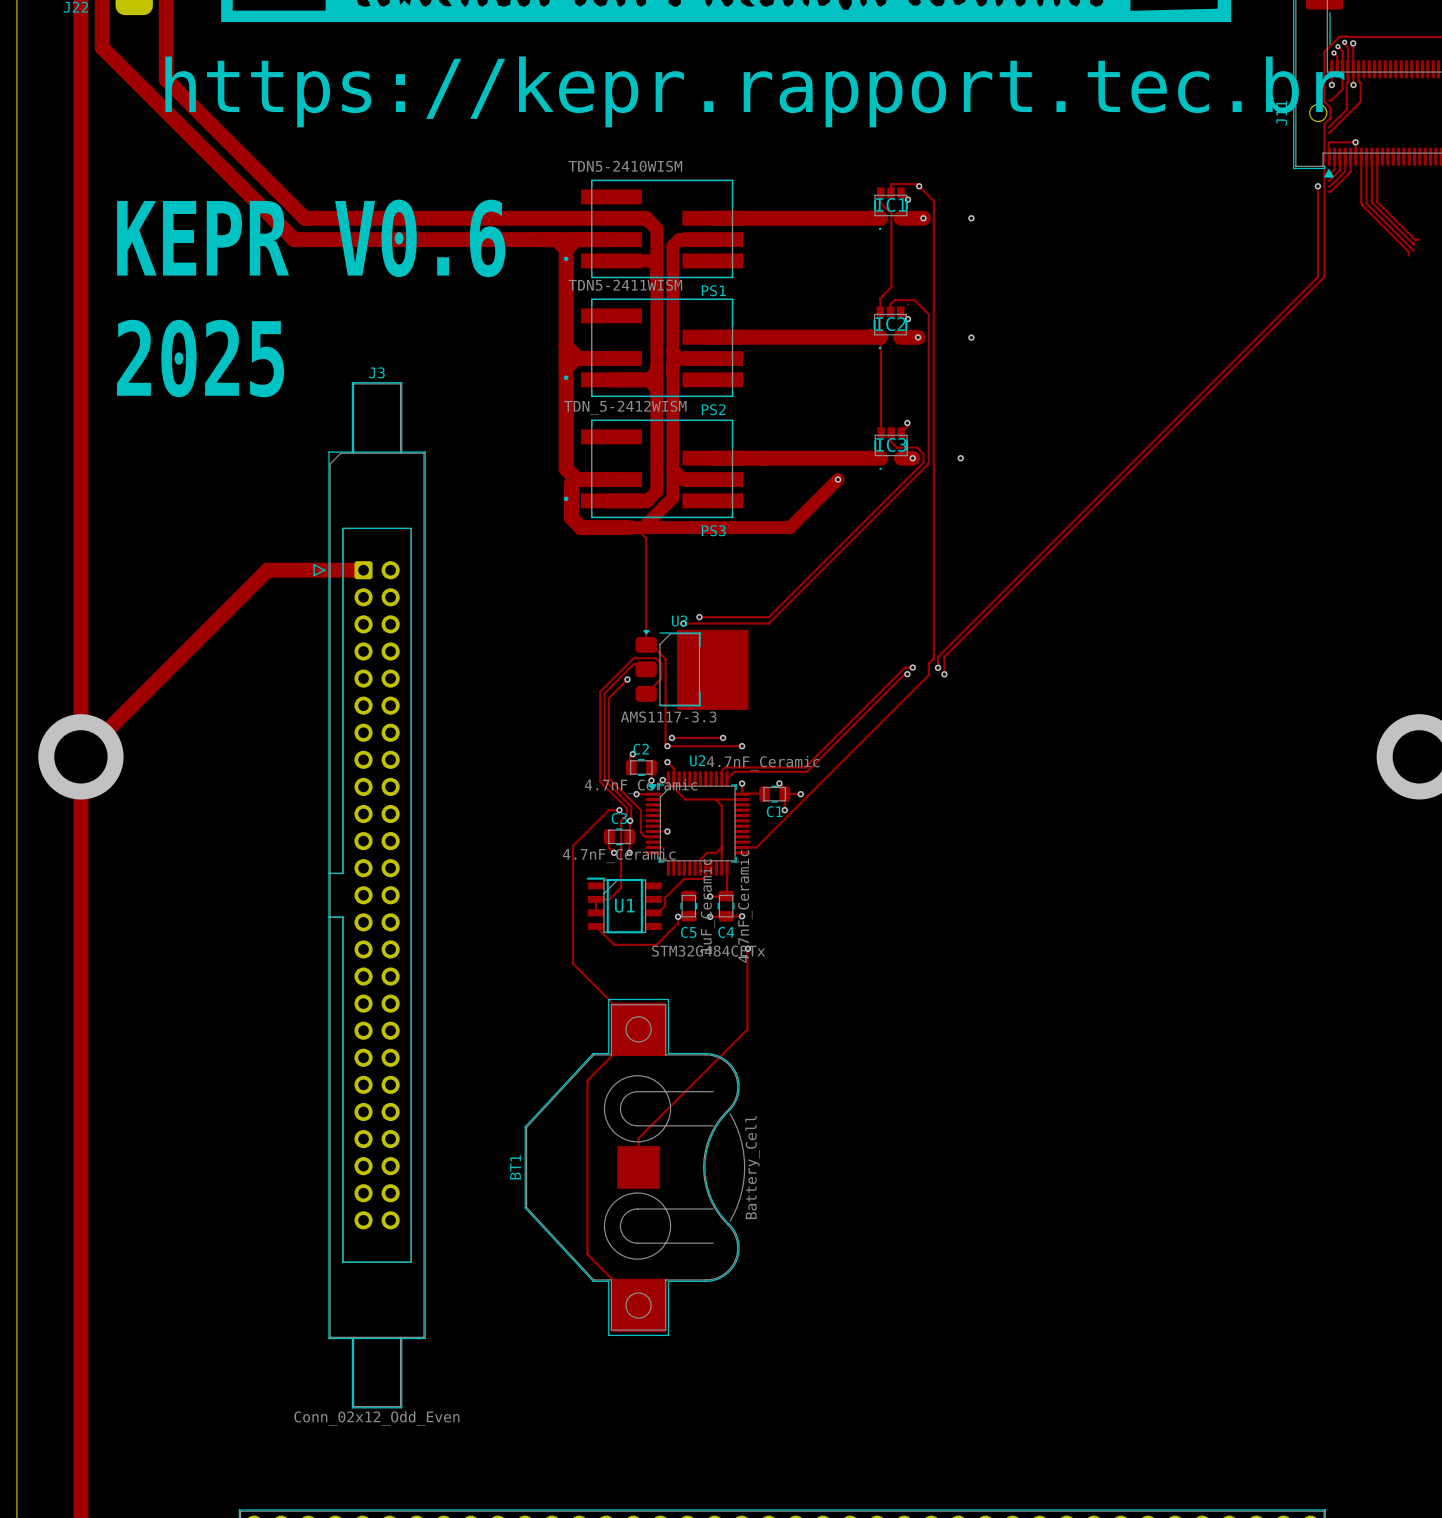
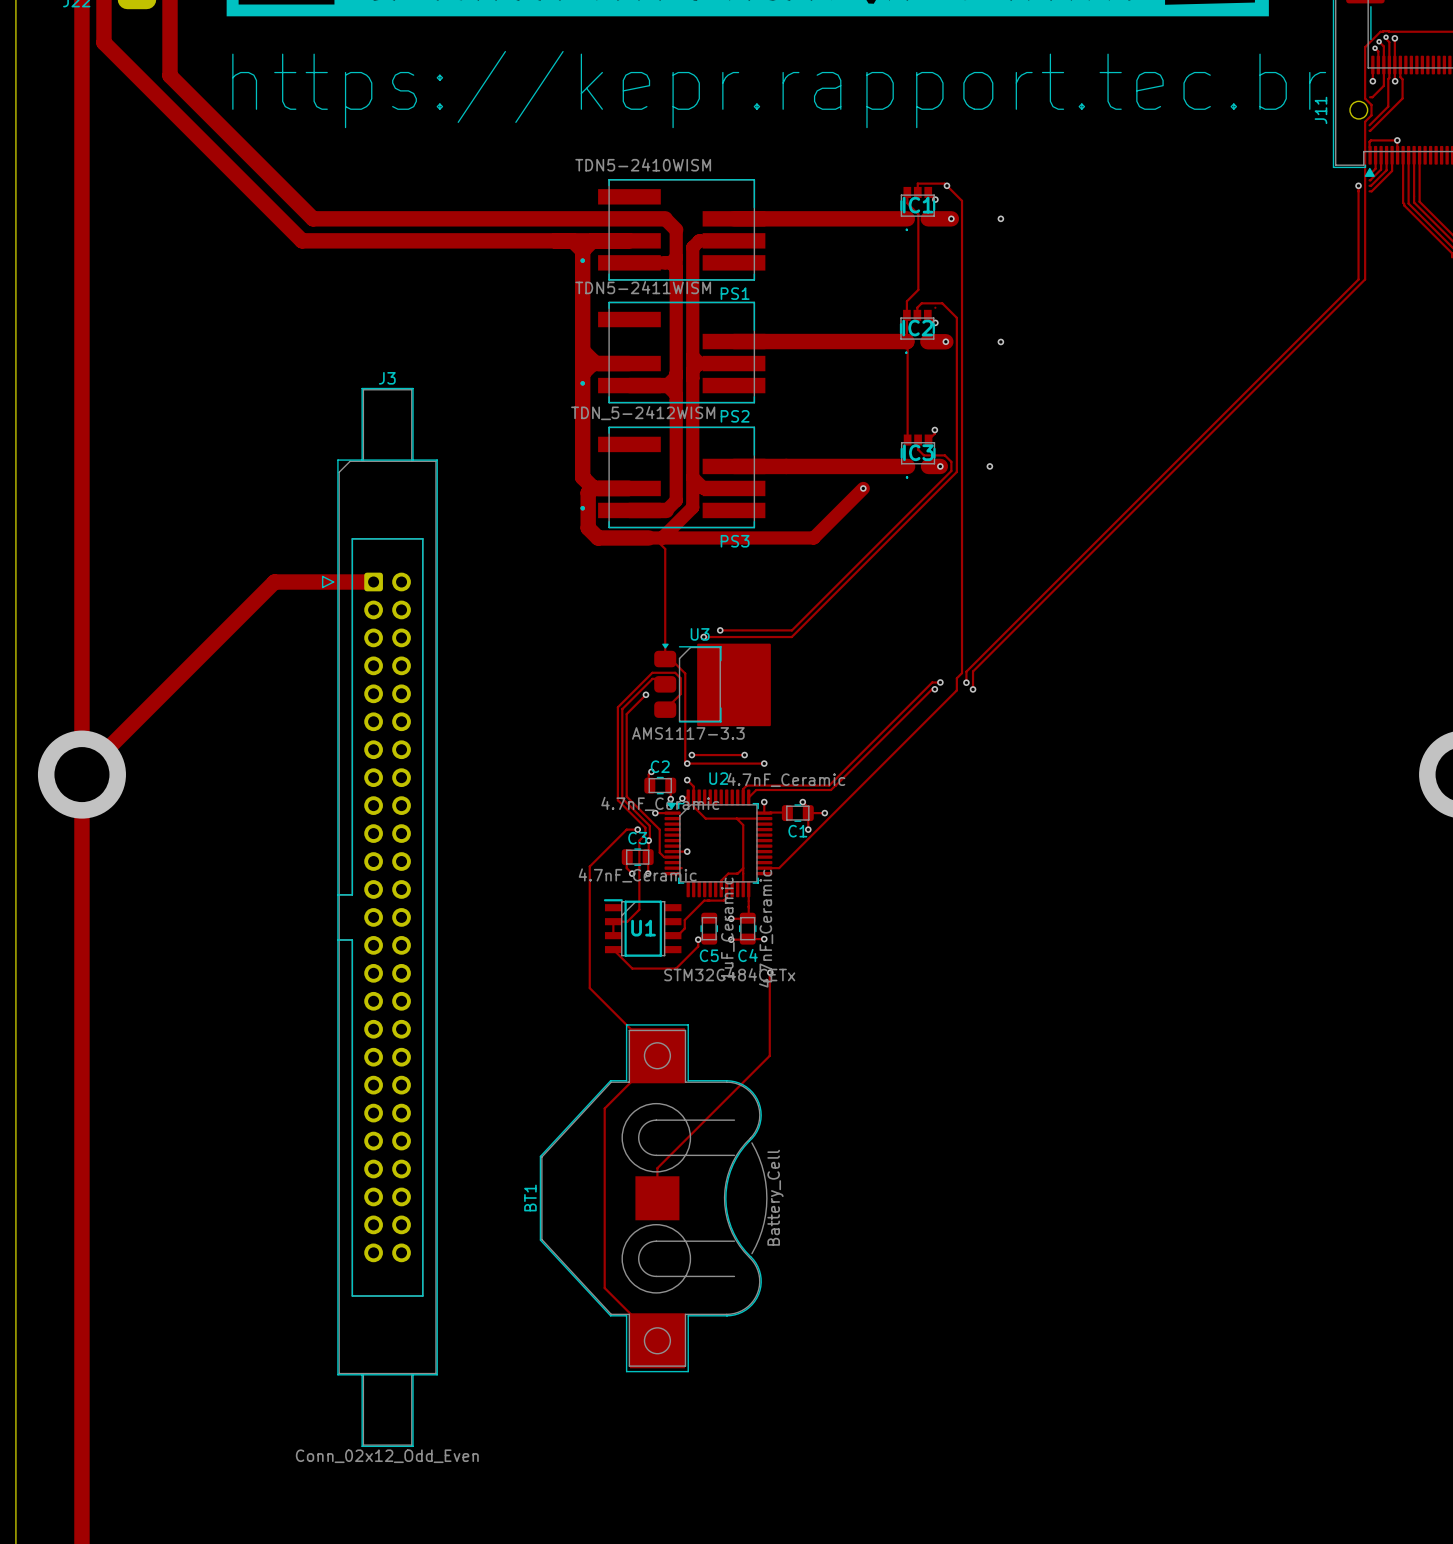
text: KEPR V0.6 (311, 238) -> none
text: 2025 (200, 358) -> none

